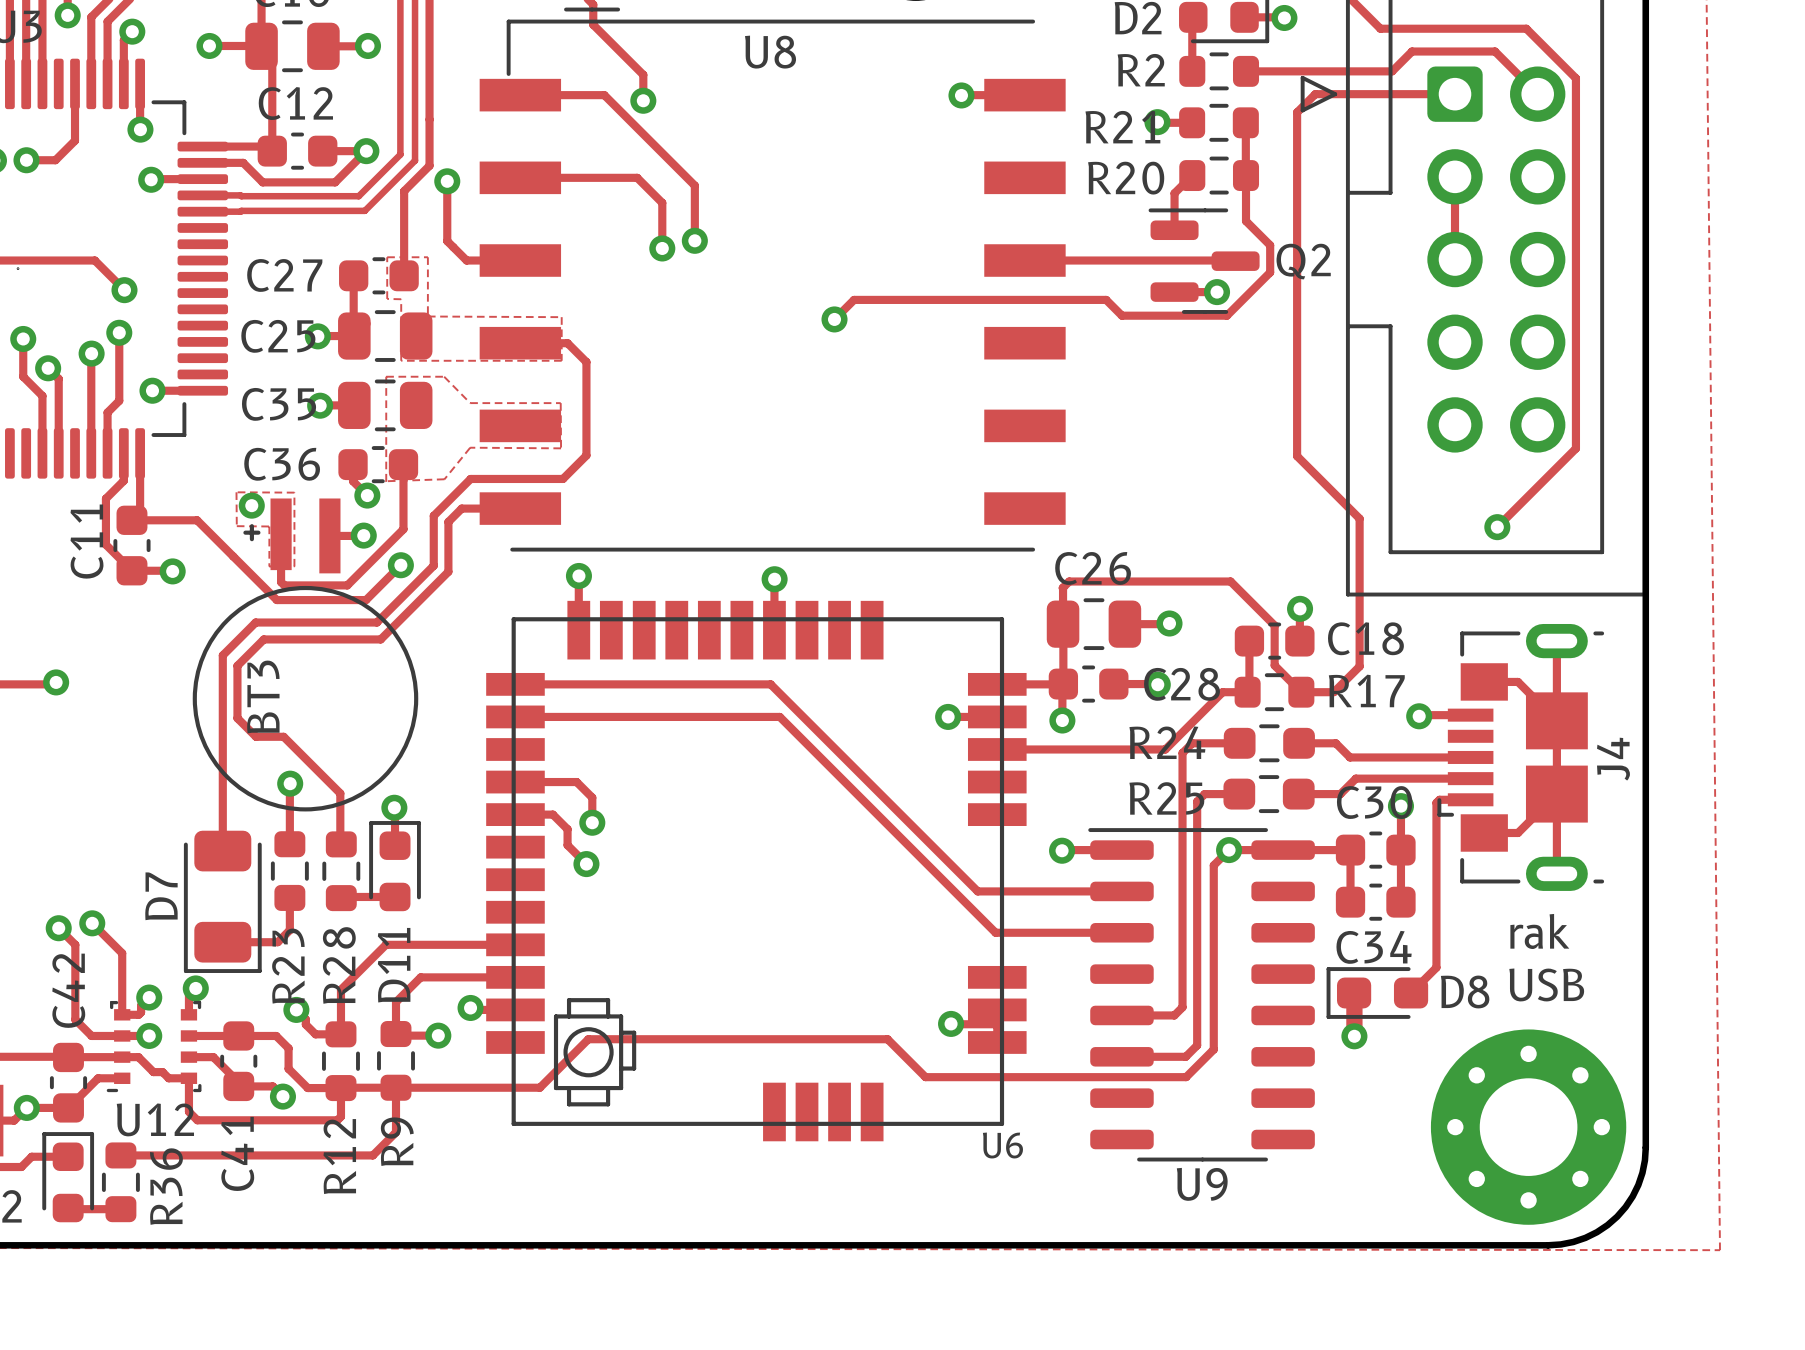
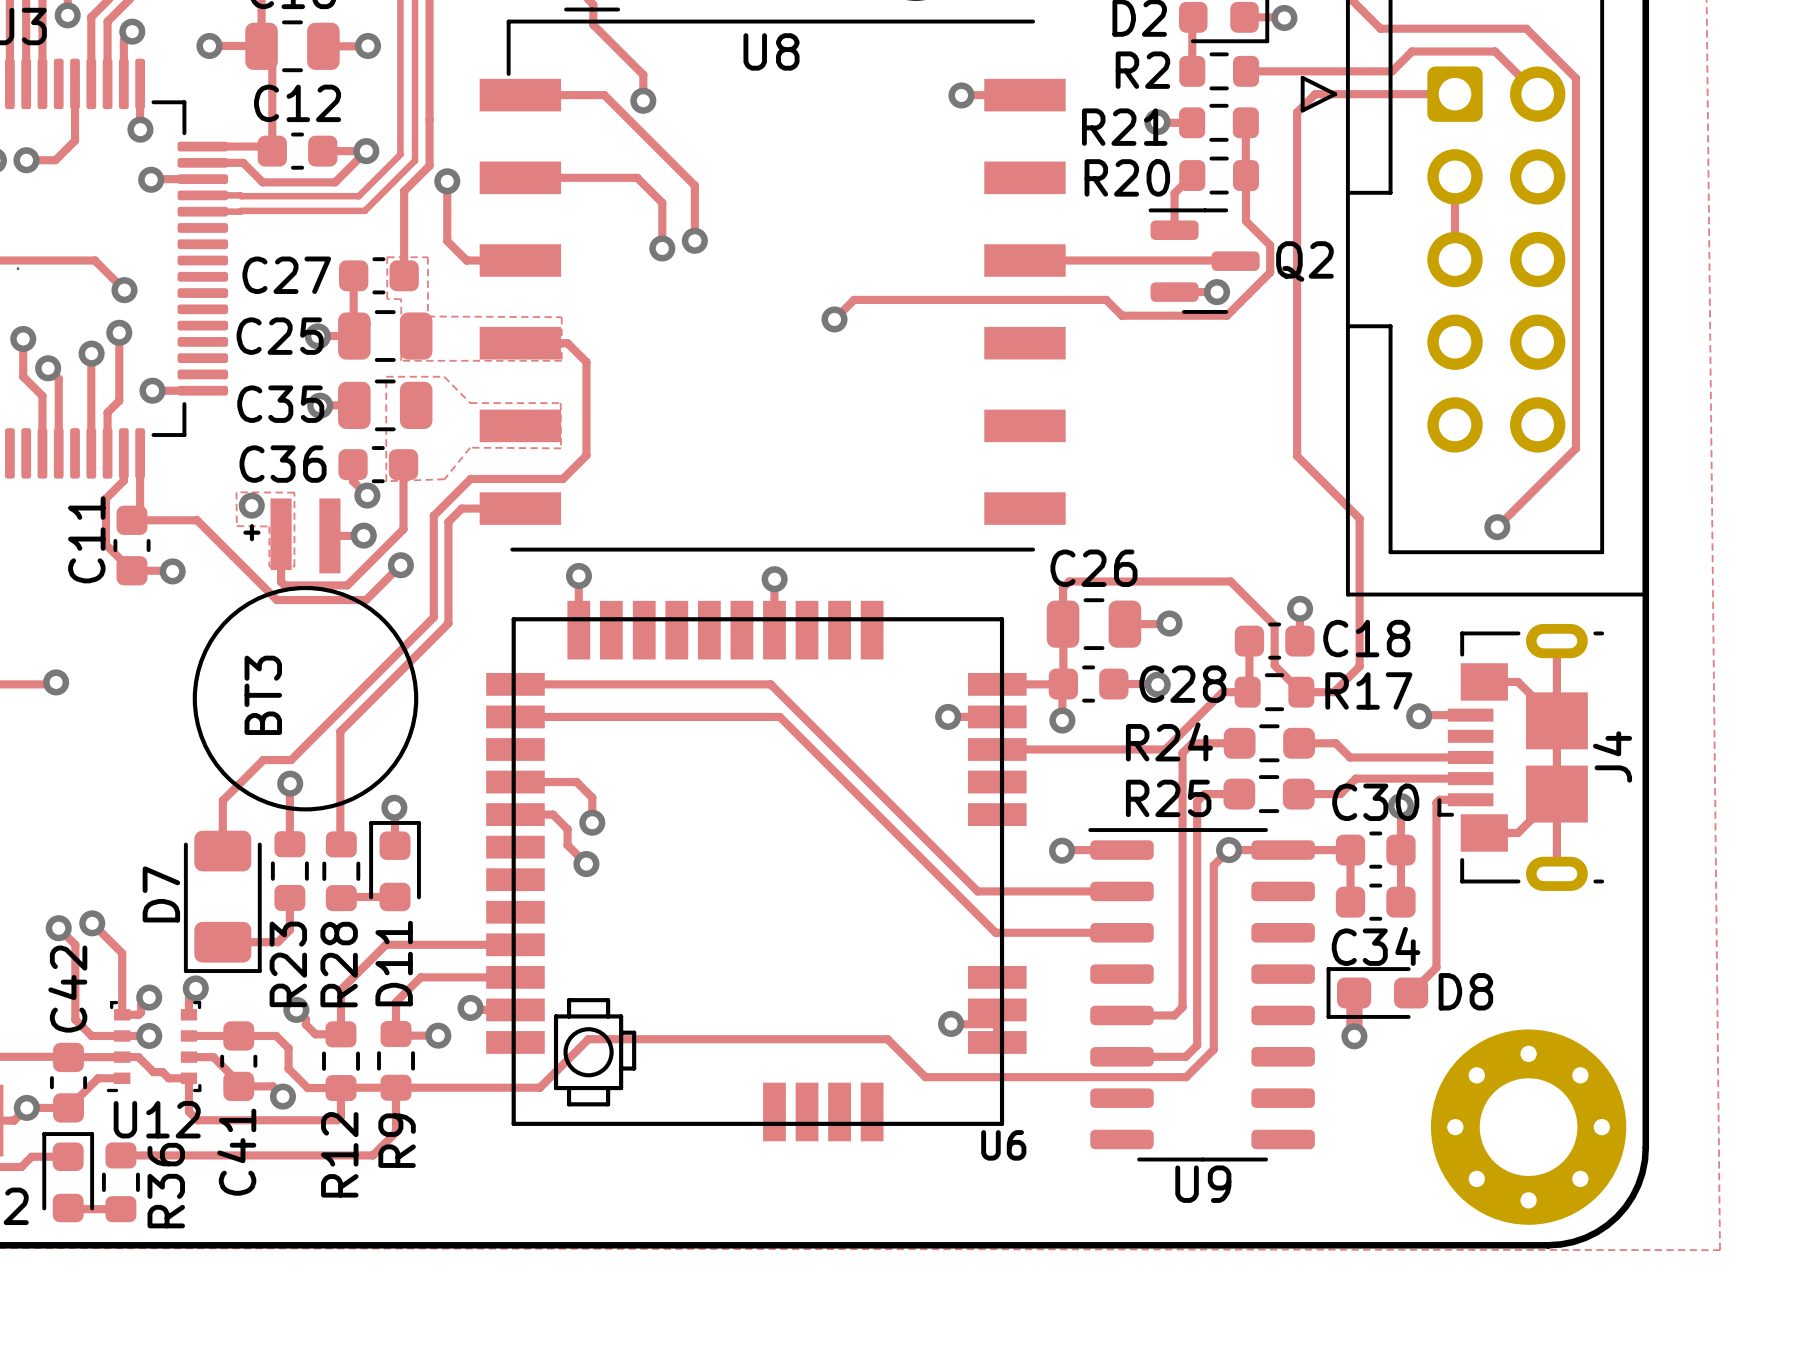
track: (433, 565) (376, 622) (255, 622) (222, 655) (222, 800) -> (433, 565) (433, 617) (291, 760) (263, 760) (222, 800)
track: (448, 571) (380, 639) (263, 639) (237, 665) (237, 718) (256, 736) (283, 736) (340, 793) -> (448, 571) (448, 623) (340, 731) (340, 793)
text: rak (1539, 931) -> none
text: USB (1546, 984) -> none

